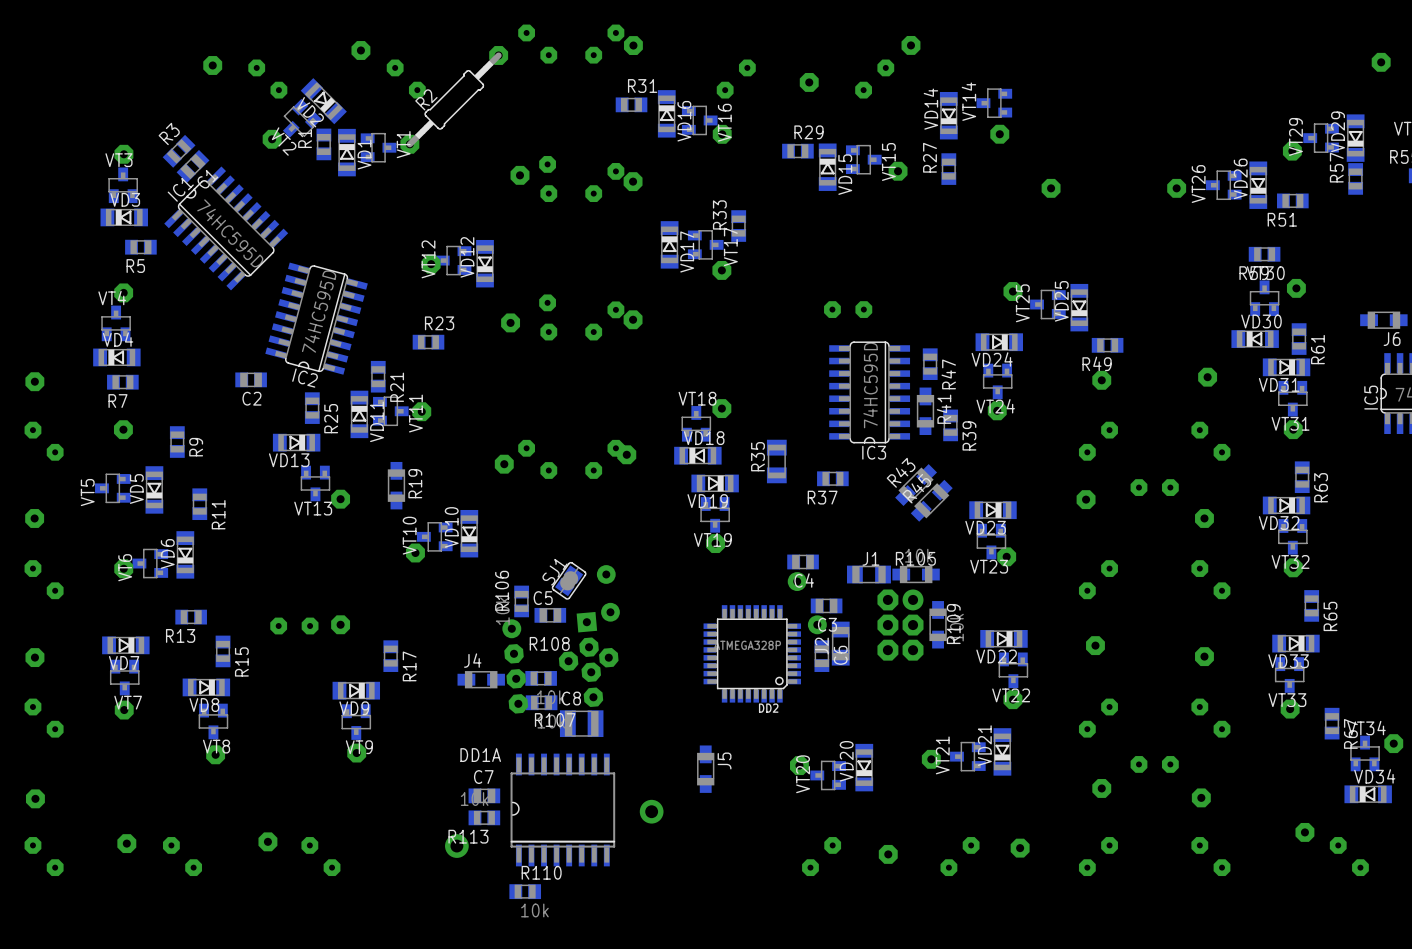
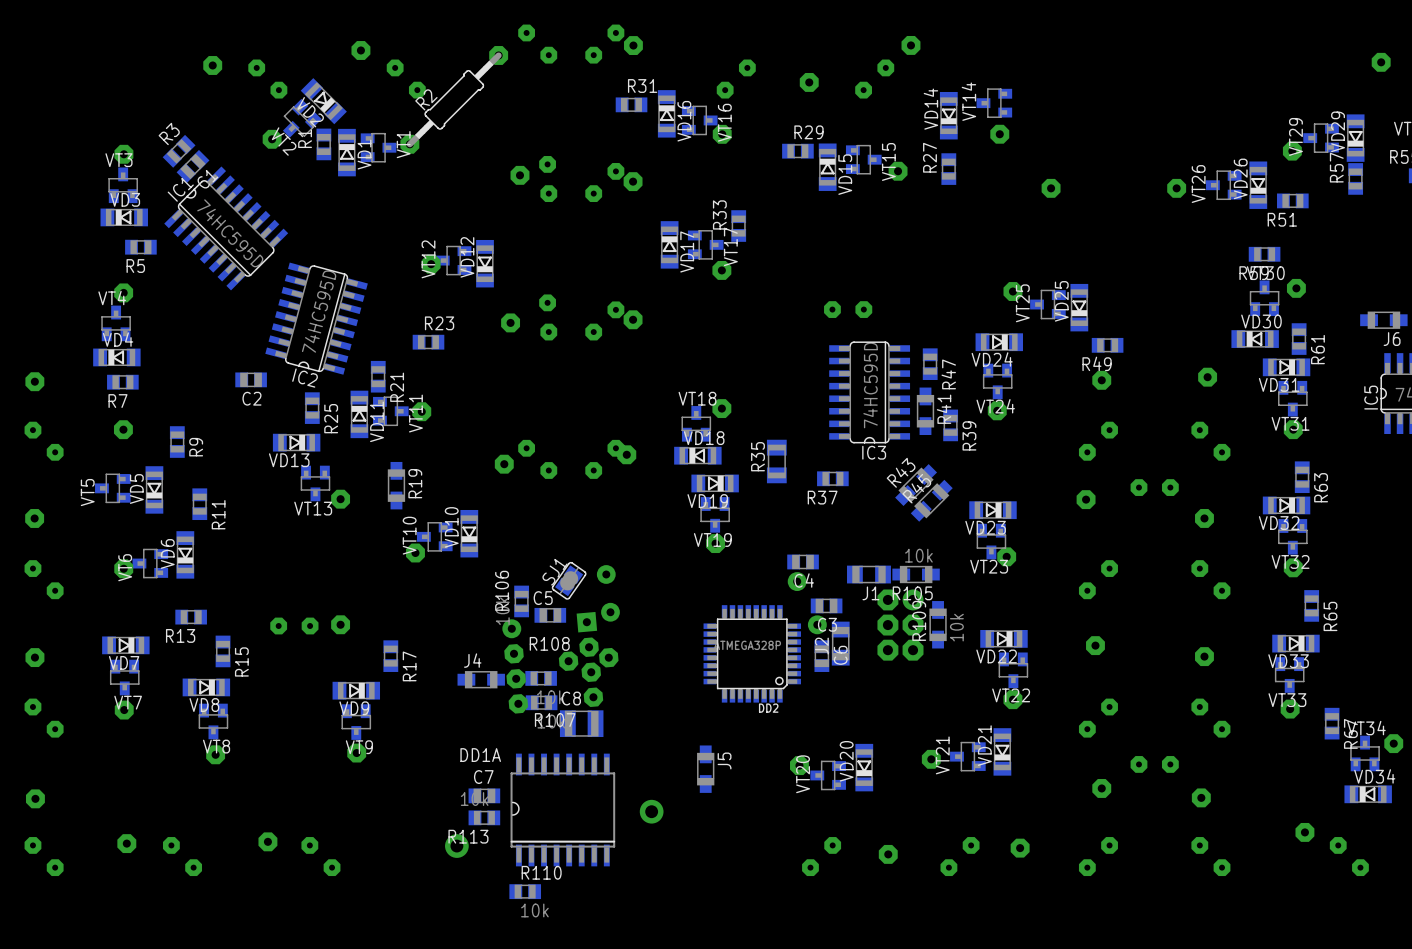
J1 name position: J1 (870, 558) -> J1 (870, 593)
R105 name position: R105 (915, 558) -> R105 (912, 593)
R109 name position: R109 (953, 624) -> R109 (919, 620)

